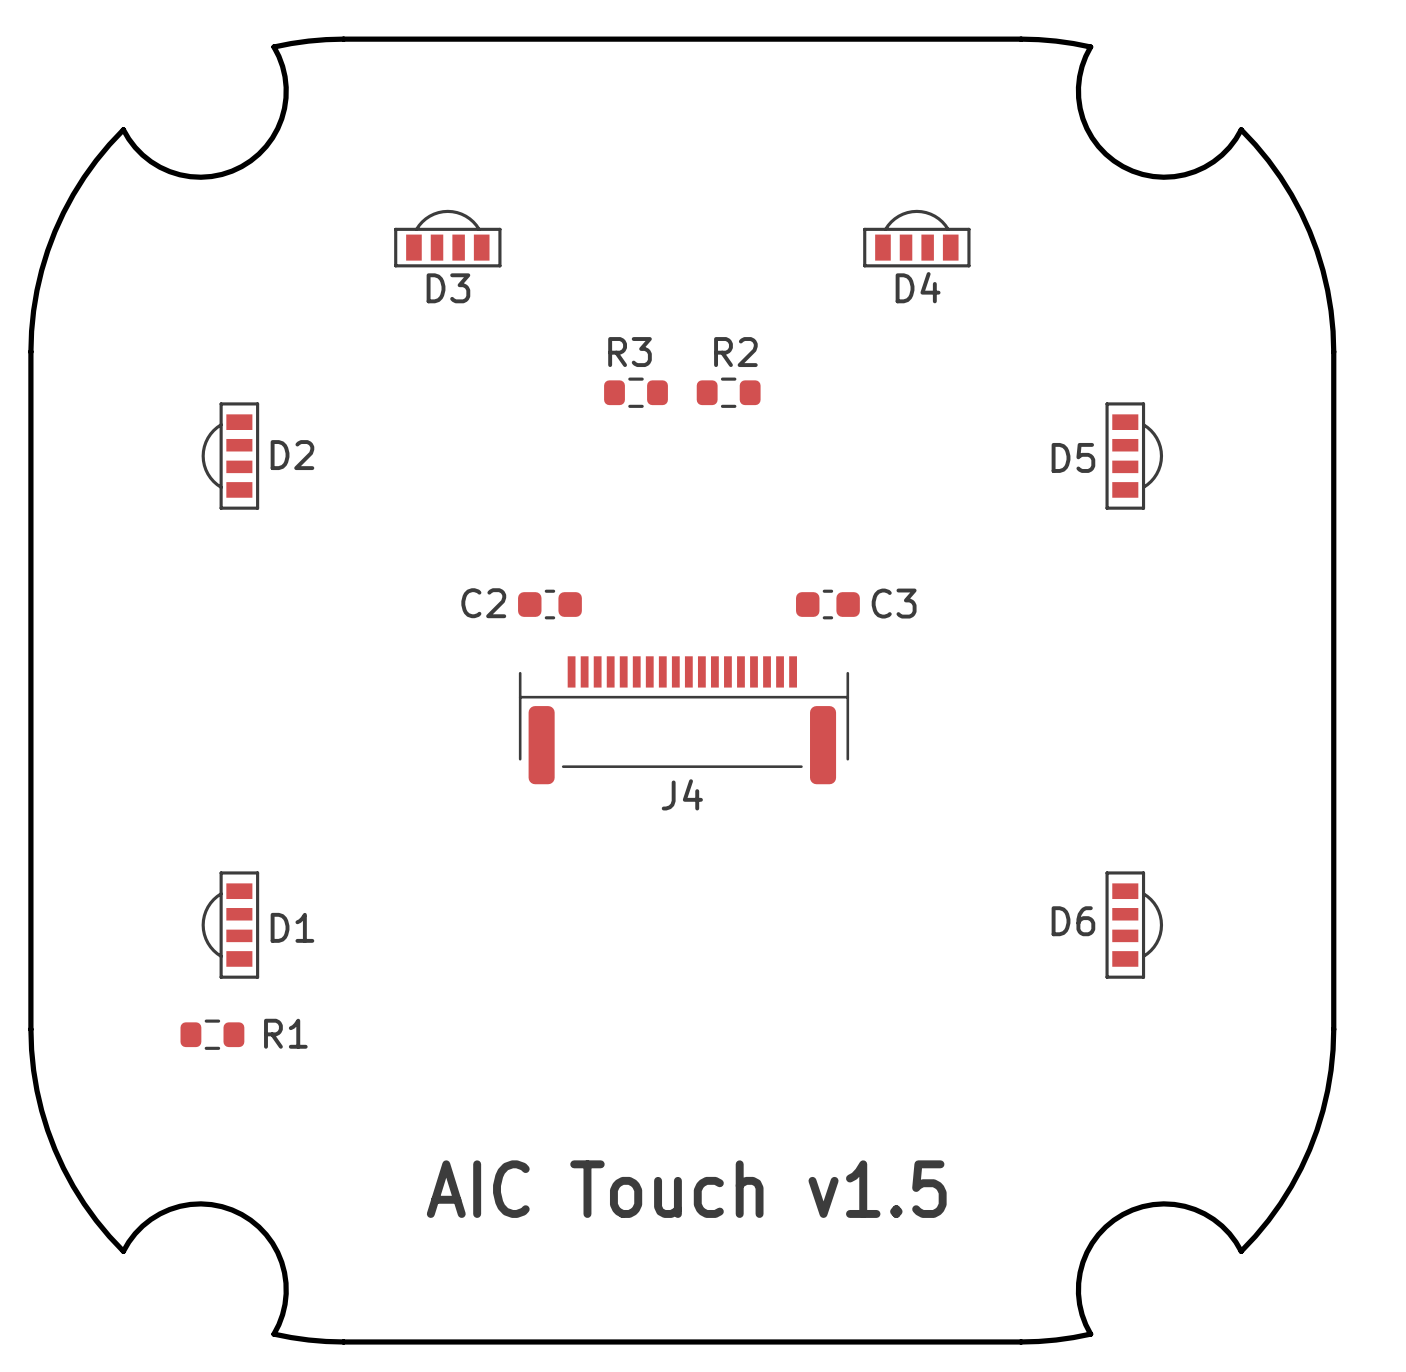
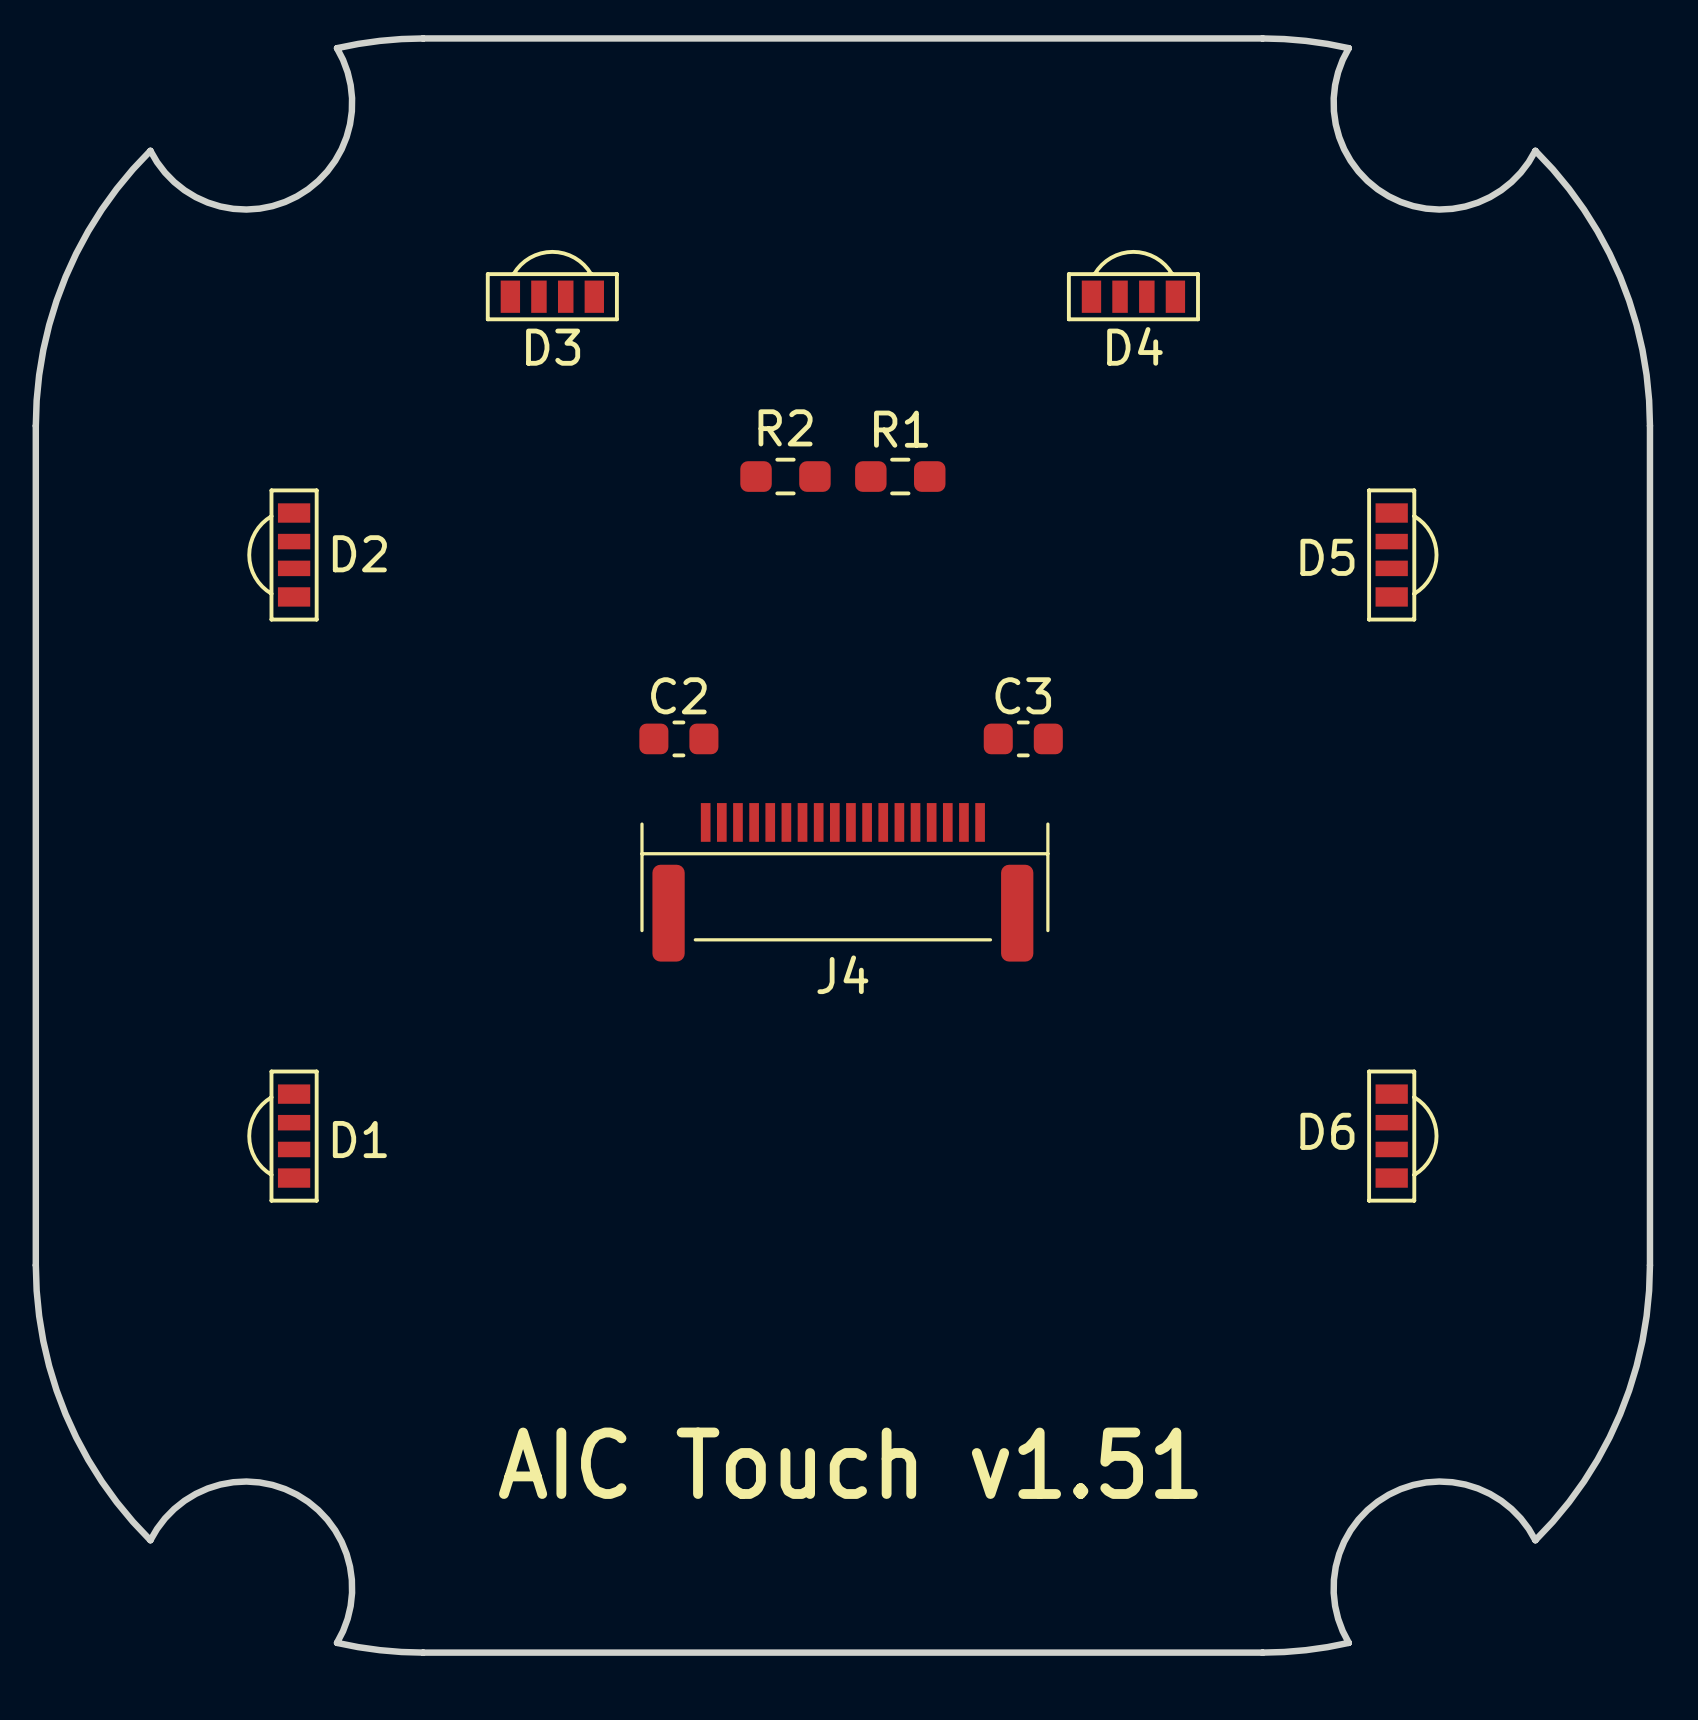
R2 footprint: [696, 377, 761, 408] -> [740, 457, 831, 496]
R3: (636, 392) -> none
C2 name position: C2 (483, 603) -> C2 (678, 695)
C3 name position: C3 (894, 603) -> C3 (1023, 695)
R1 footprint: [180, 1019, 245, 1050] -> [855, 457, 946, 496]
R1 name position: R1 (285, 1033) -> R1 (901, 429)
text: AIC Touch v1.5 (686, 1189) -> AIC Touch v1.51 (848, 1463)

